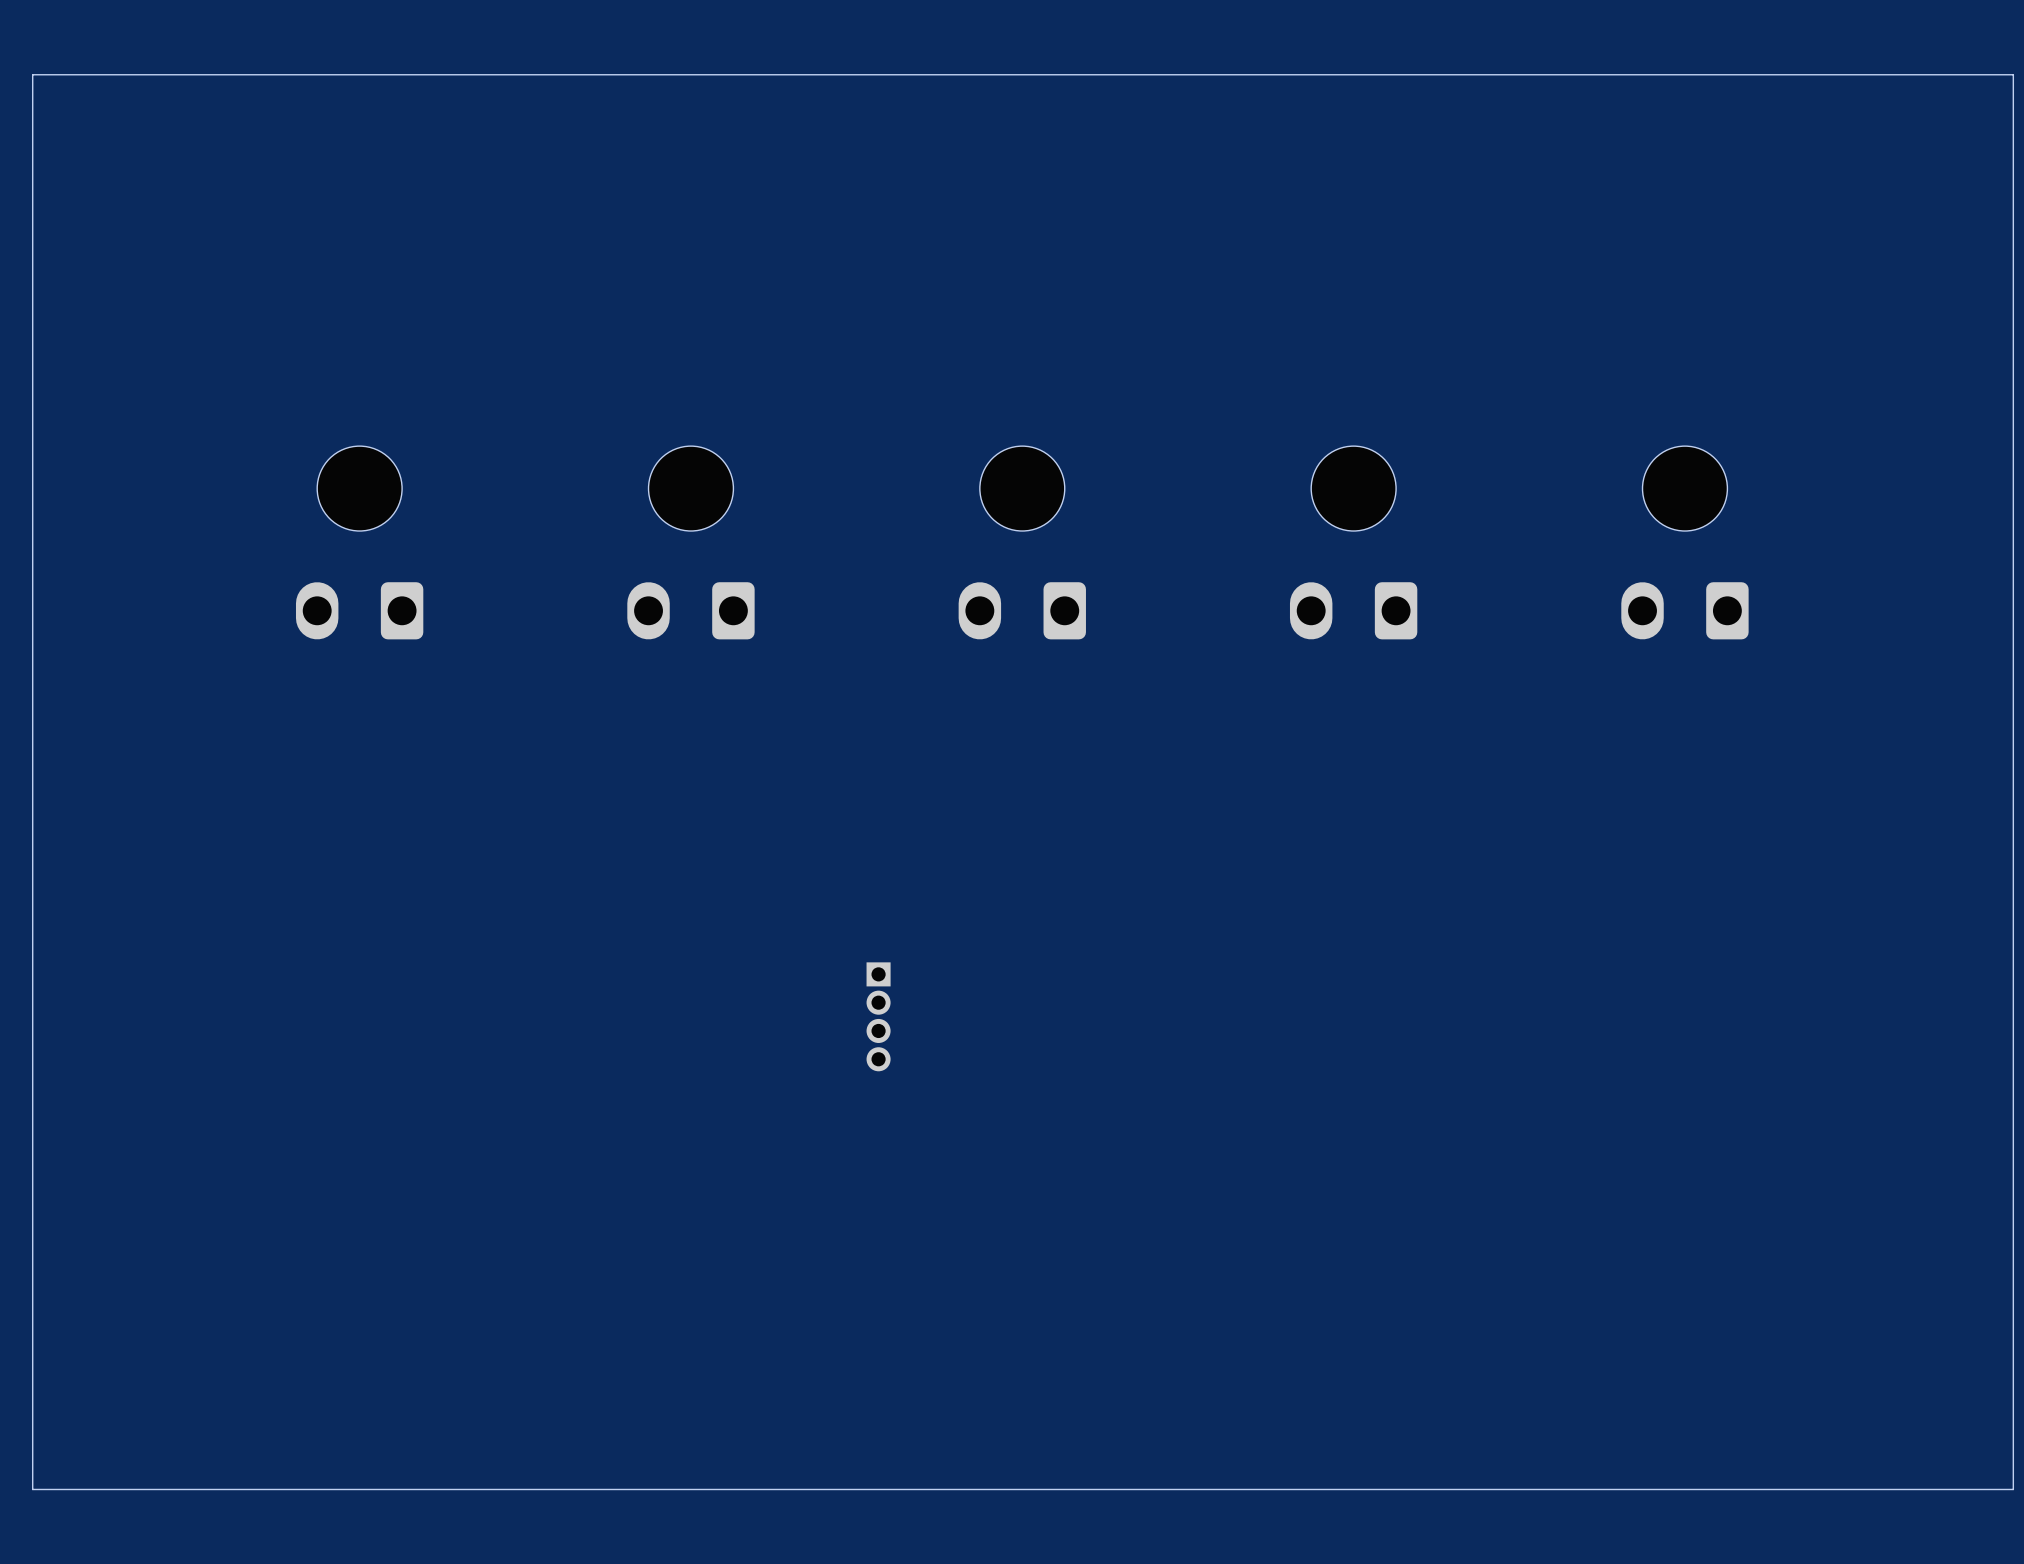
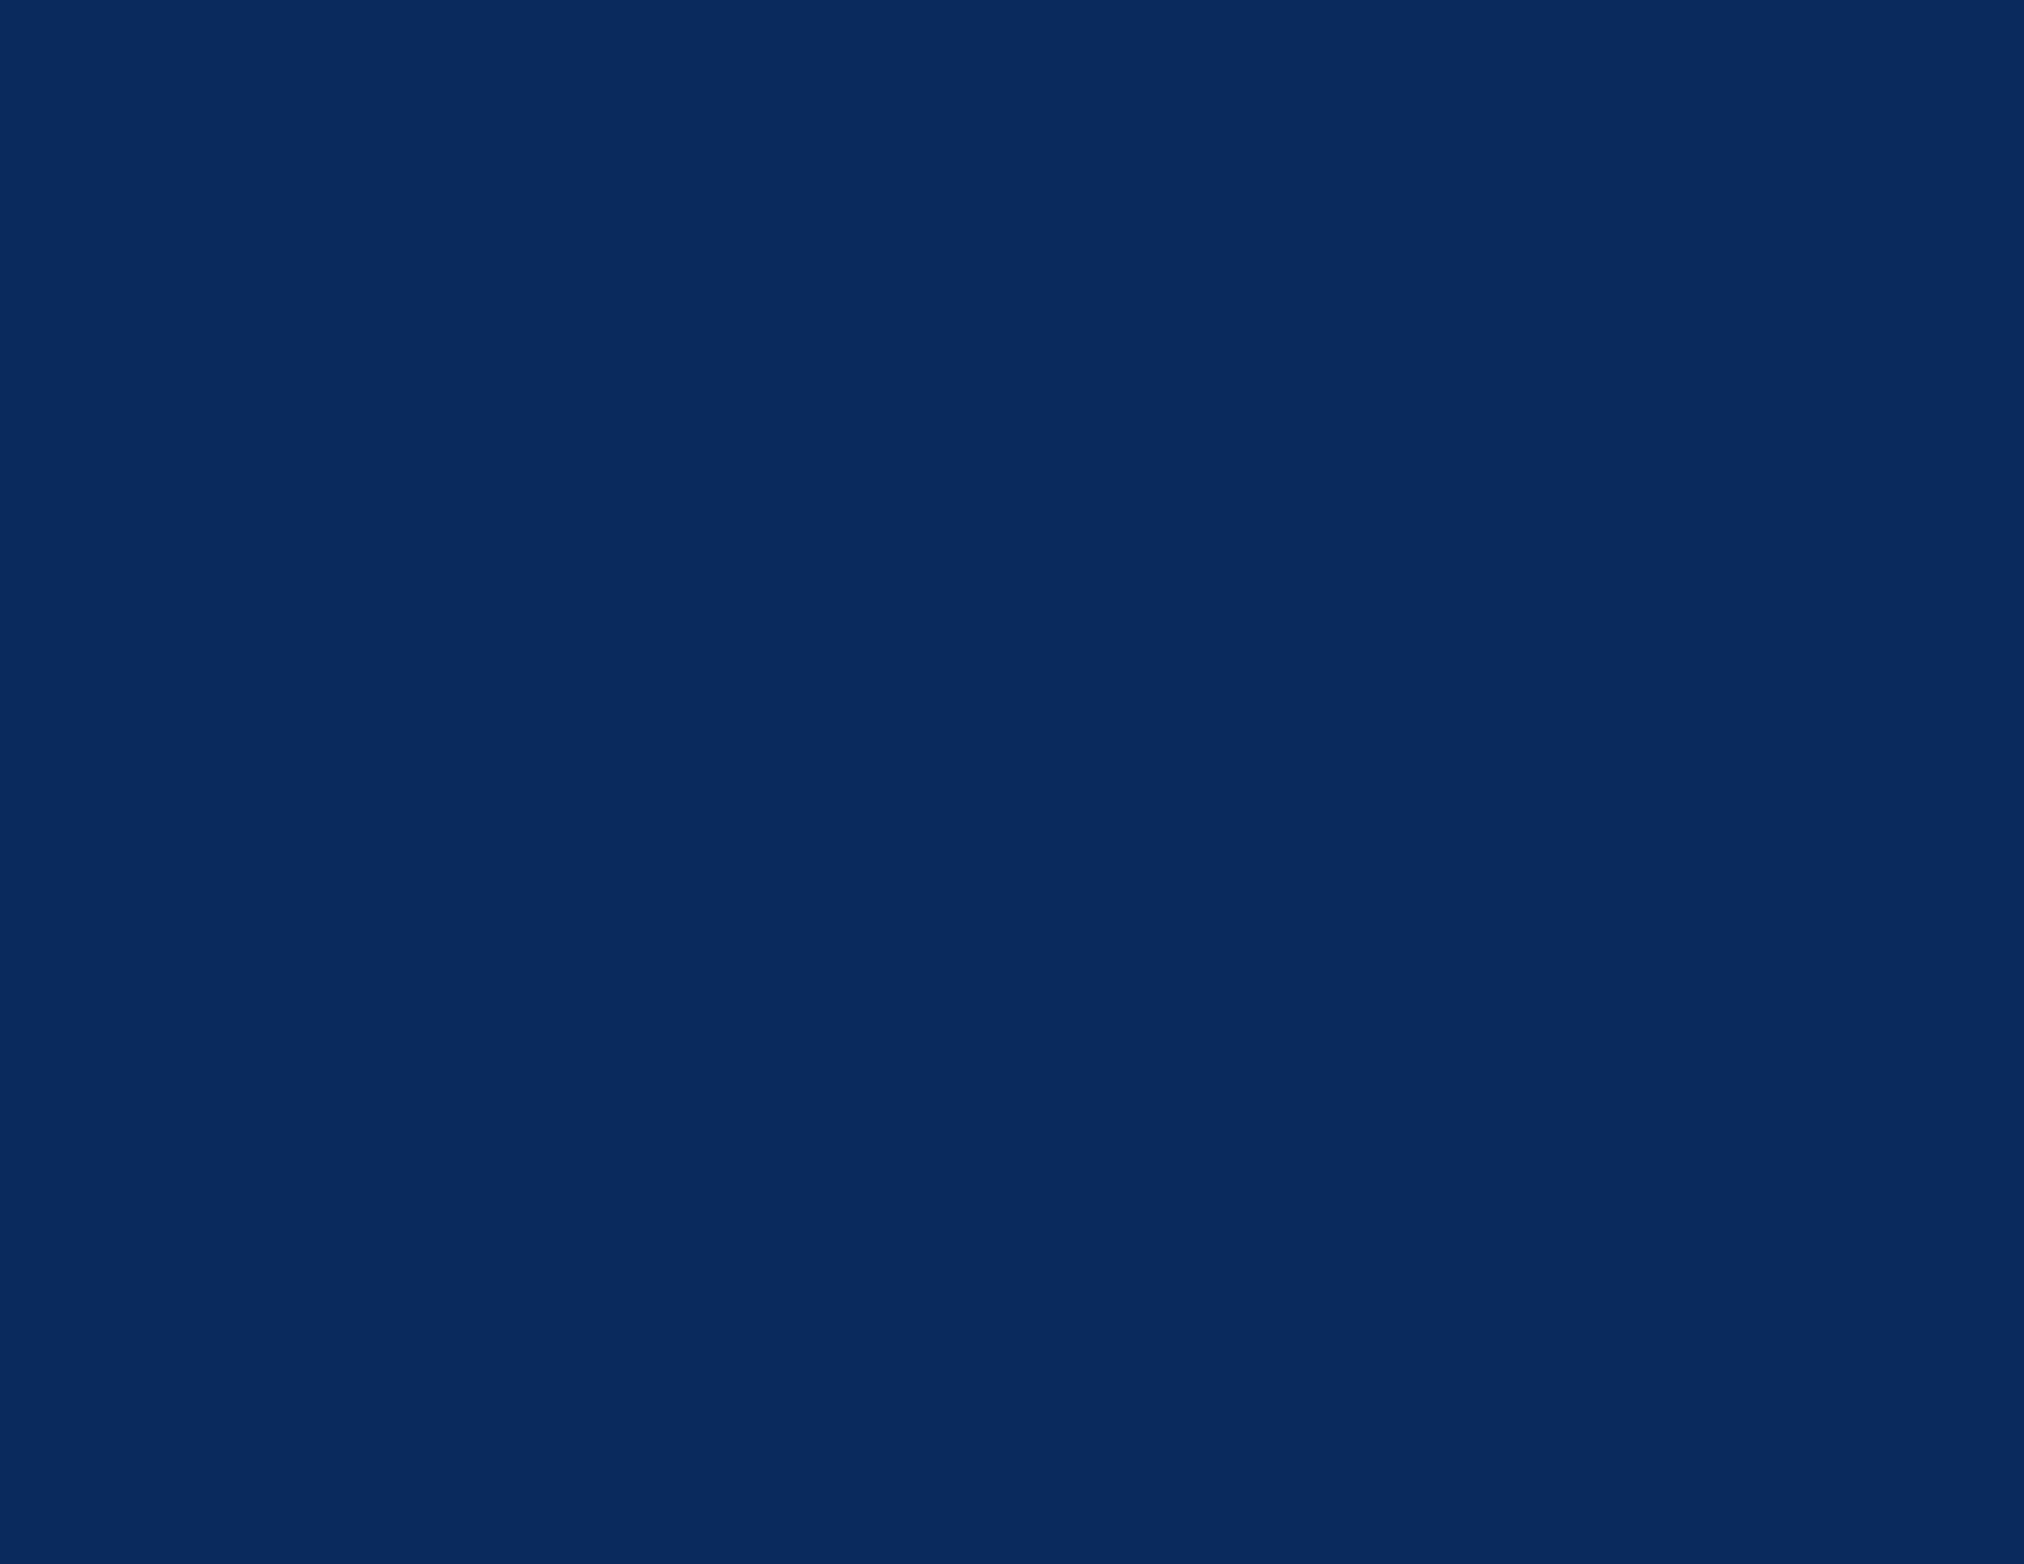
board edge: (2013, 74) (32, 74) (32, 1489) (2013, 1489) (2013, 74) -> none
part: (359, 542) -> none
part: (690, 542) -> none
part: (1022, 542) -> none
part: (1353, 542) -> none
part: (1684, 542) -> none
part: (878, 1016) -> none

